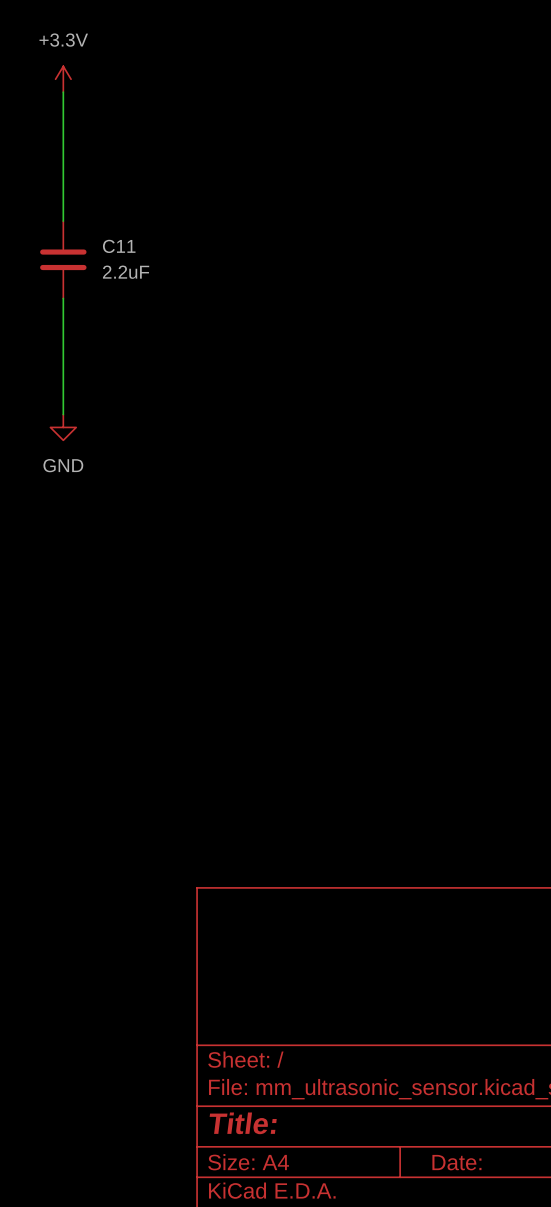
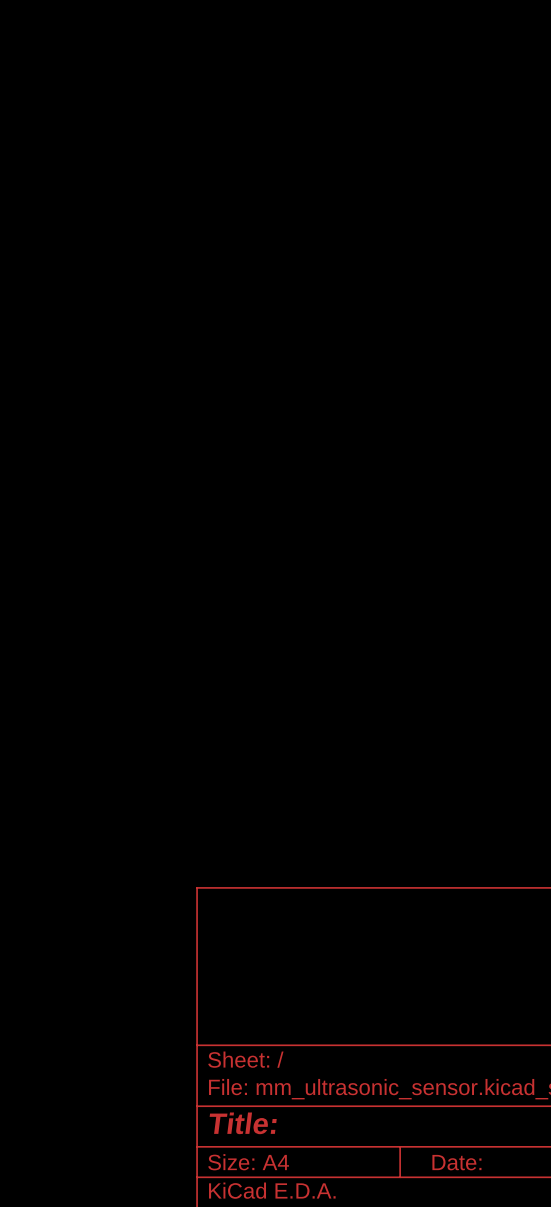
power symbol: +3.3V (63, 79) -> none
wire: (63, 92) (63, 221) -> none
C11: 2.2uF (63, 259) -> none
wire: (63, 298) (63, 414) -> none
power symbol: GND (63, 427) -> none

